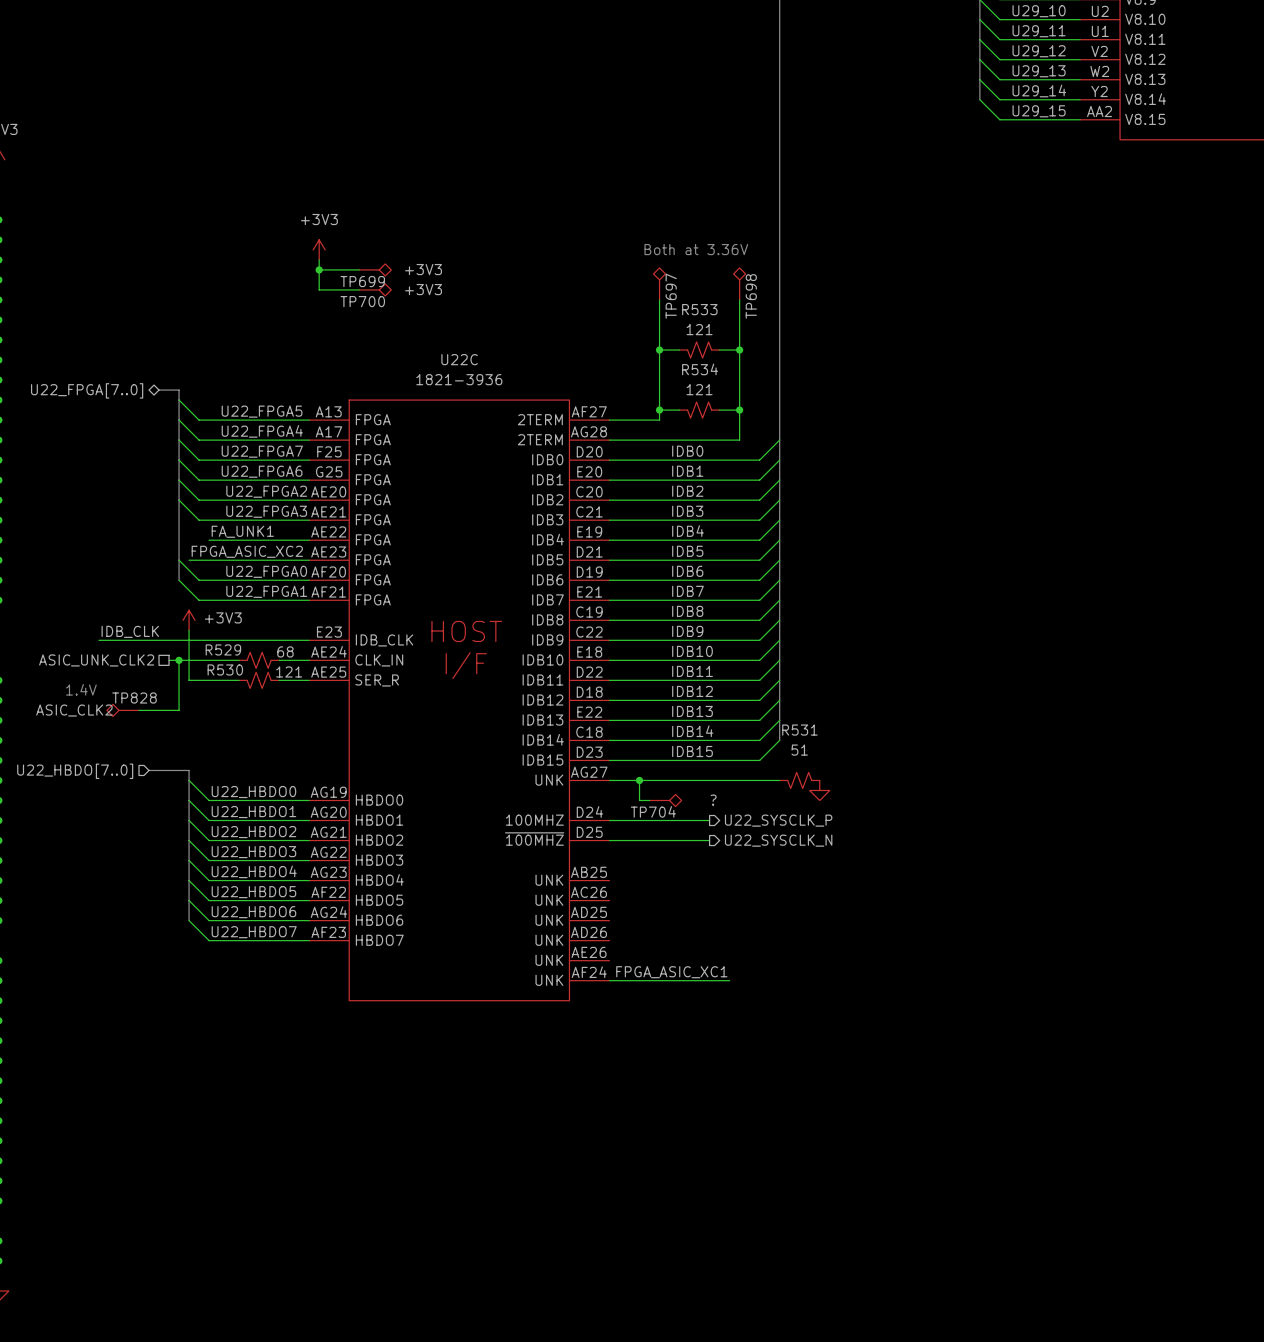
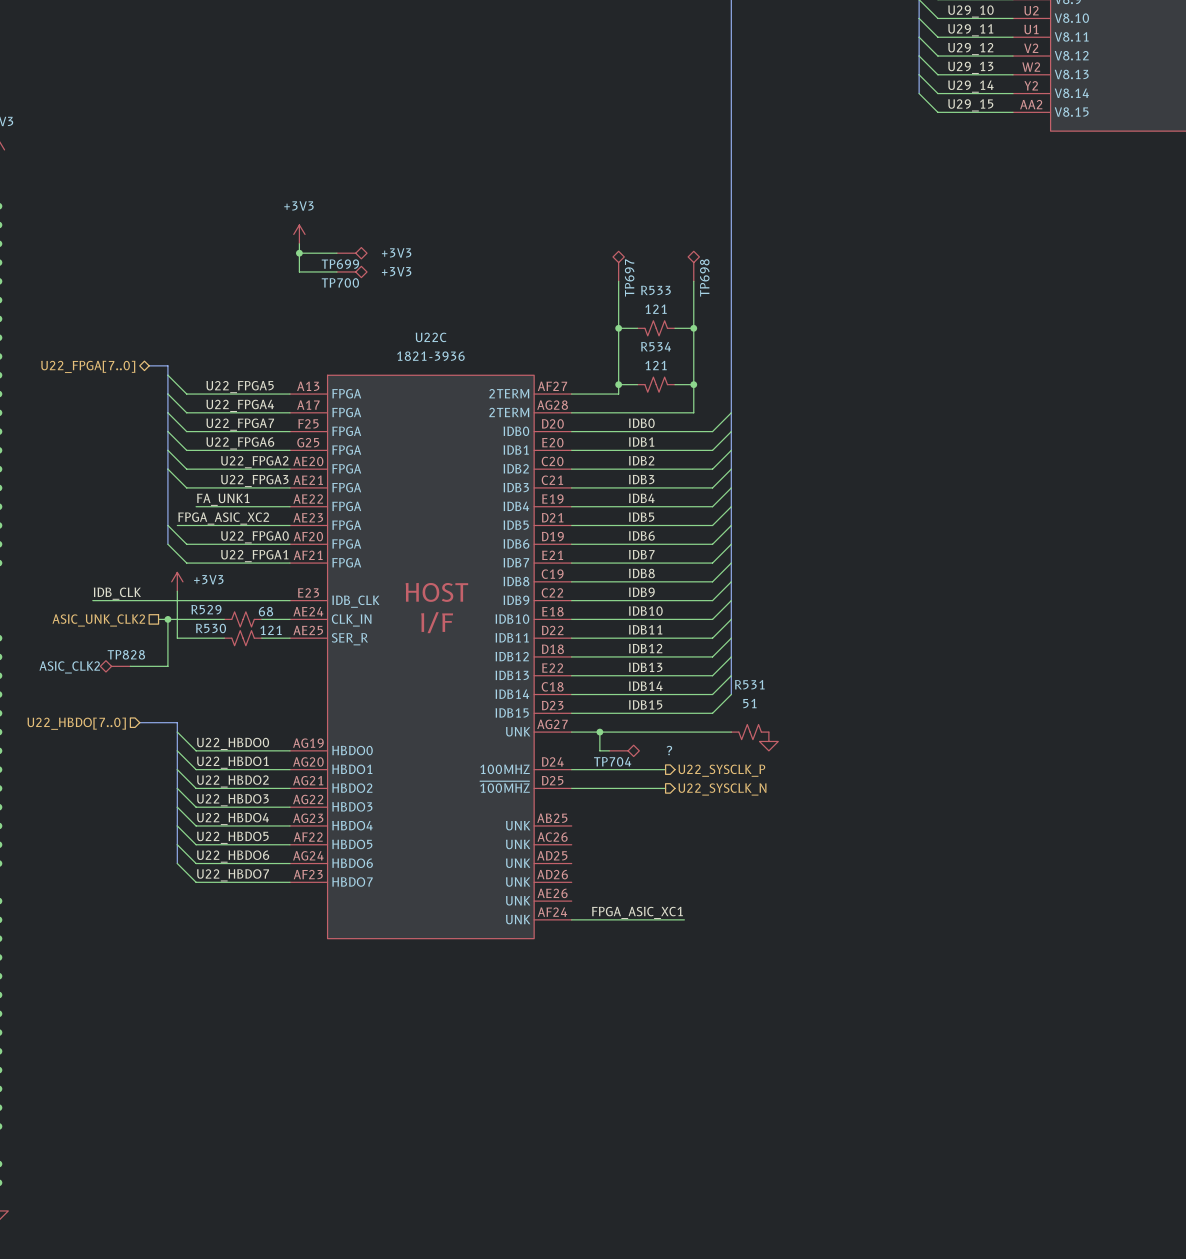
text: Both at 3.36V (696, 249) -> none
text: 1.4V (81, 689) -> none

